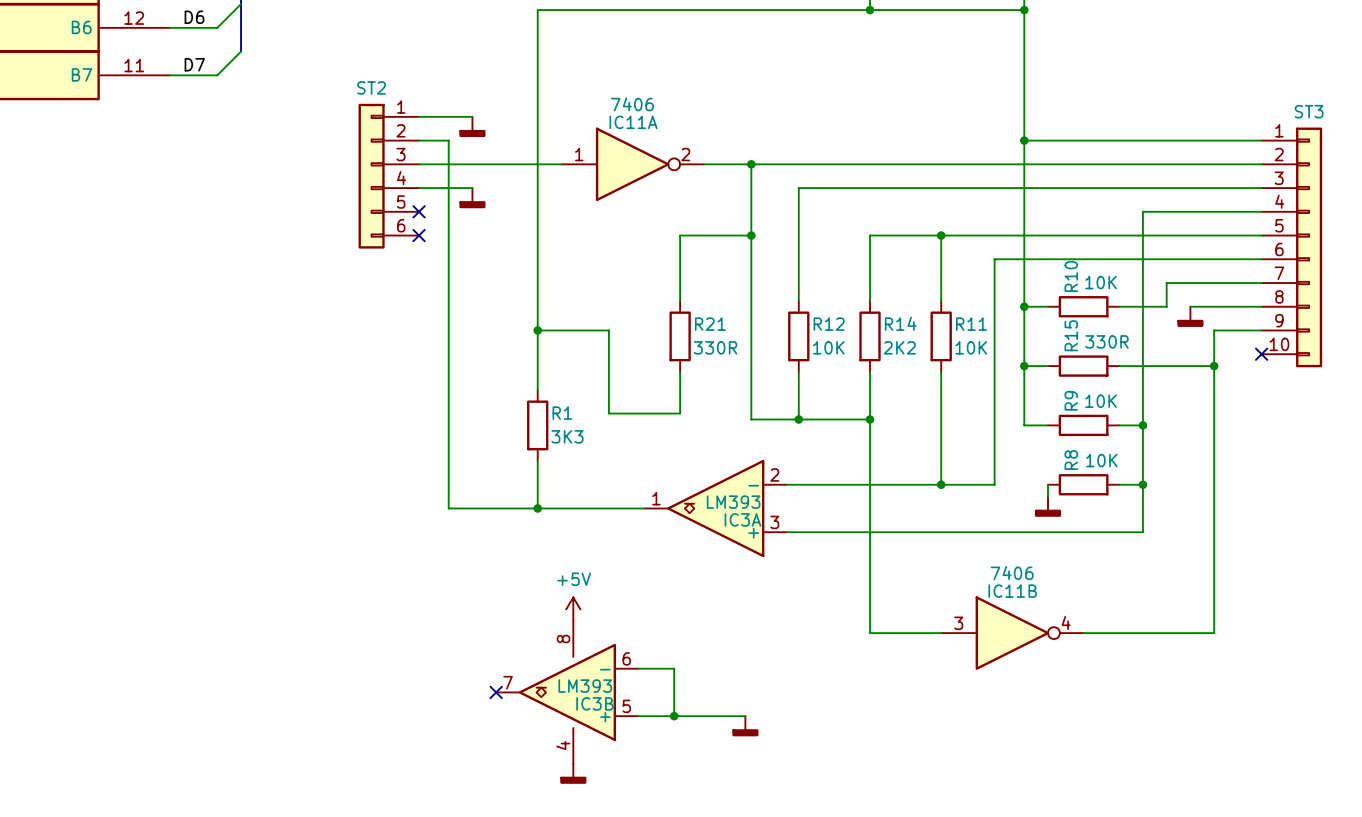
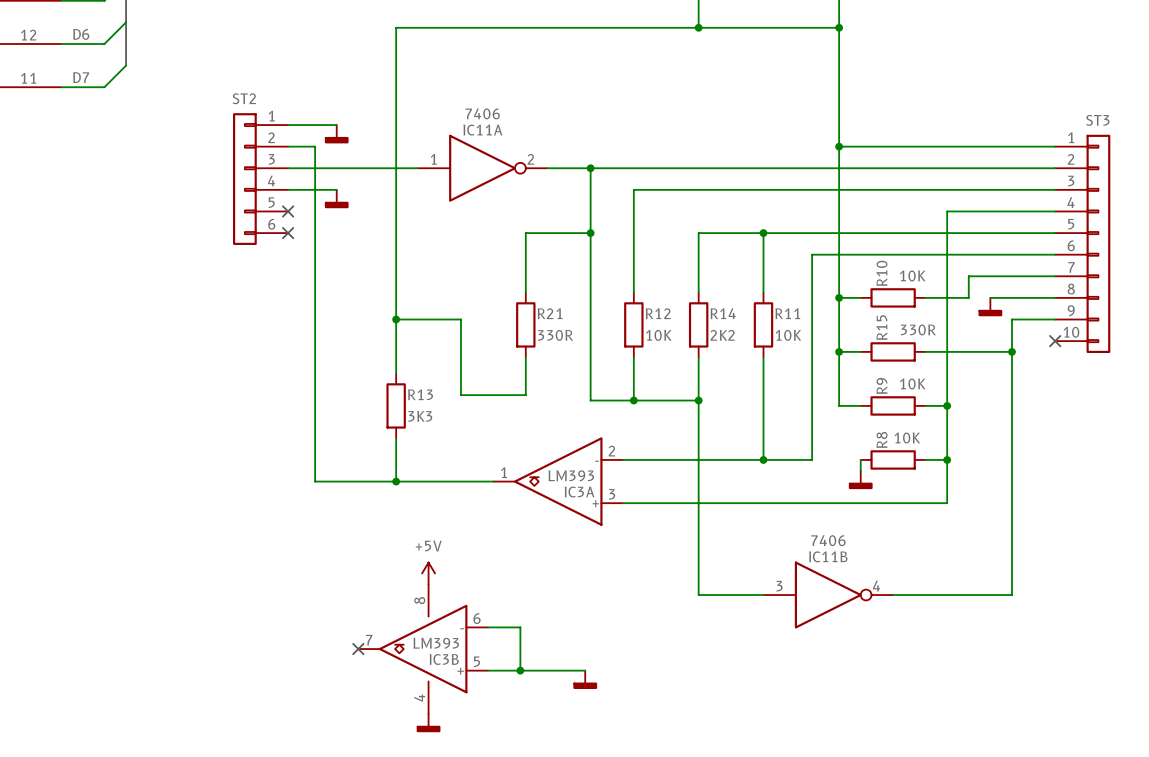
R1 name: R1 (562, 413) -> R13 (420, 394)

